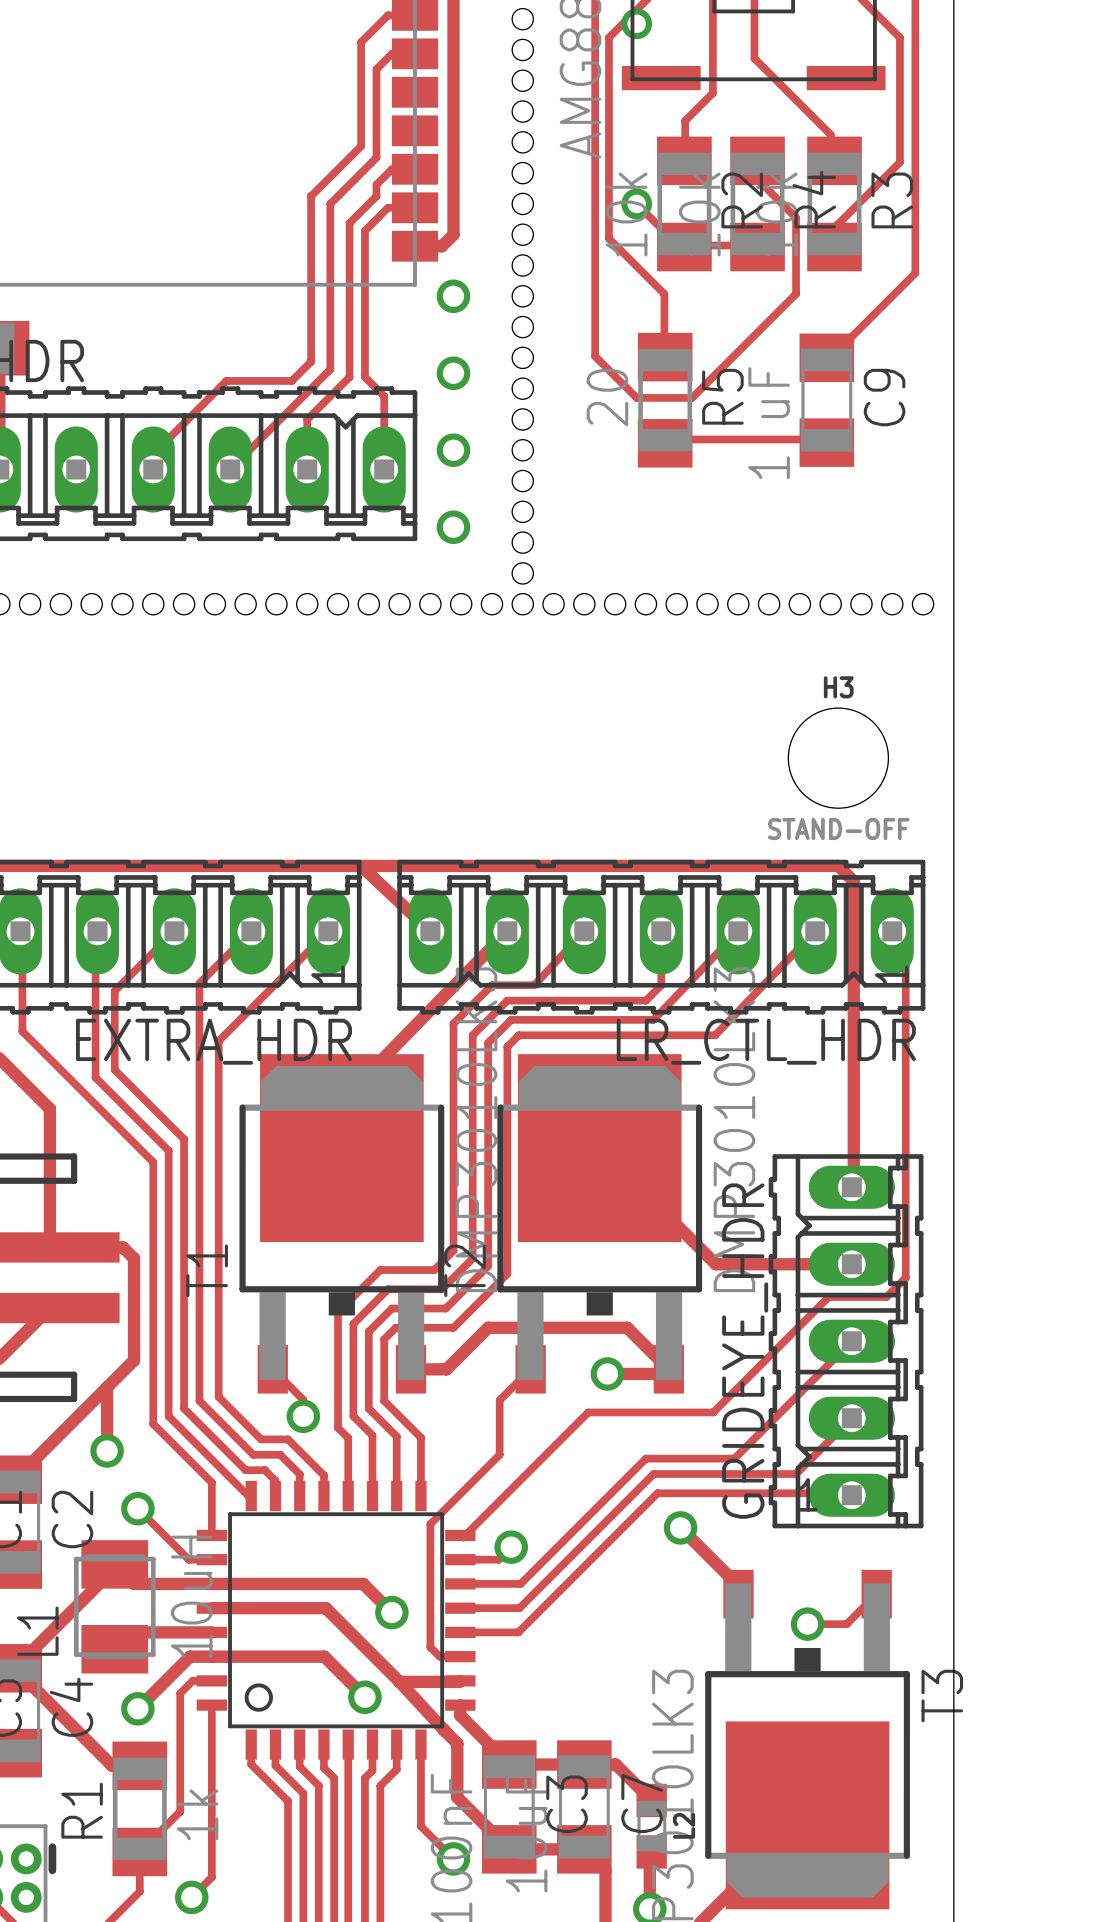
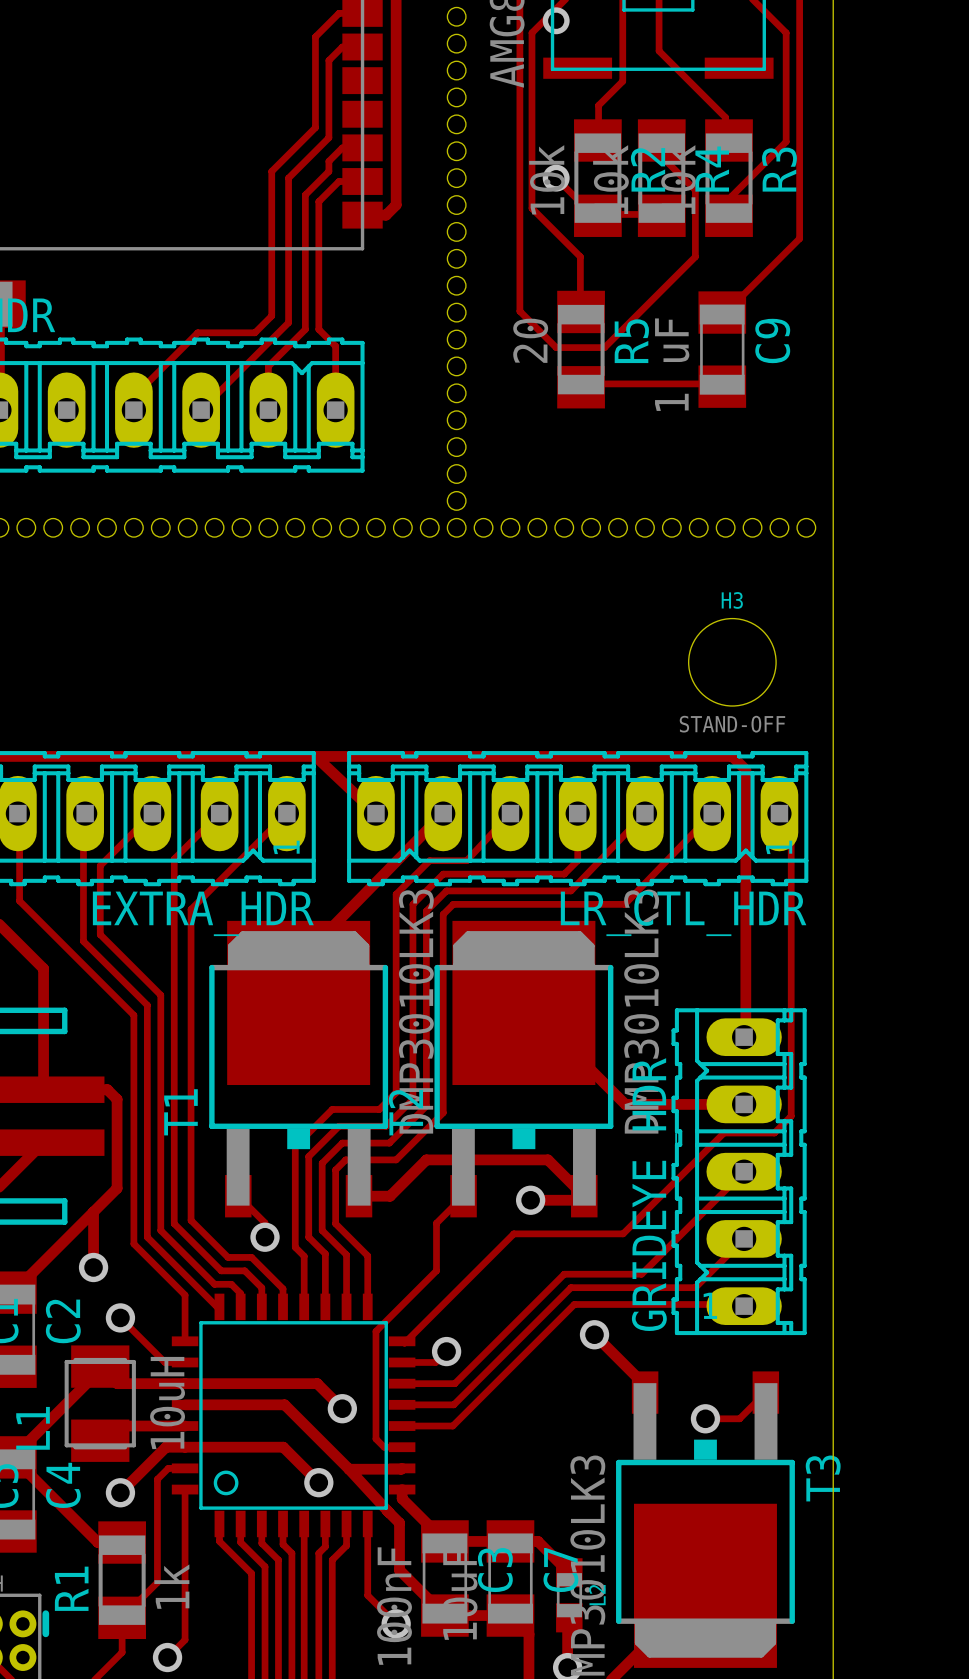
via: (453, 296) -> none
via: (453, 373) -> none
via: (453, 450) -> none
via: (453, 527) -> none

